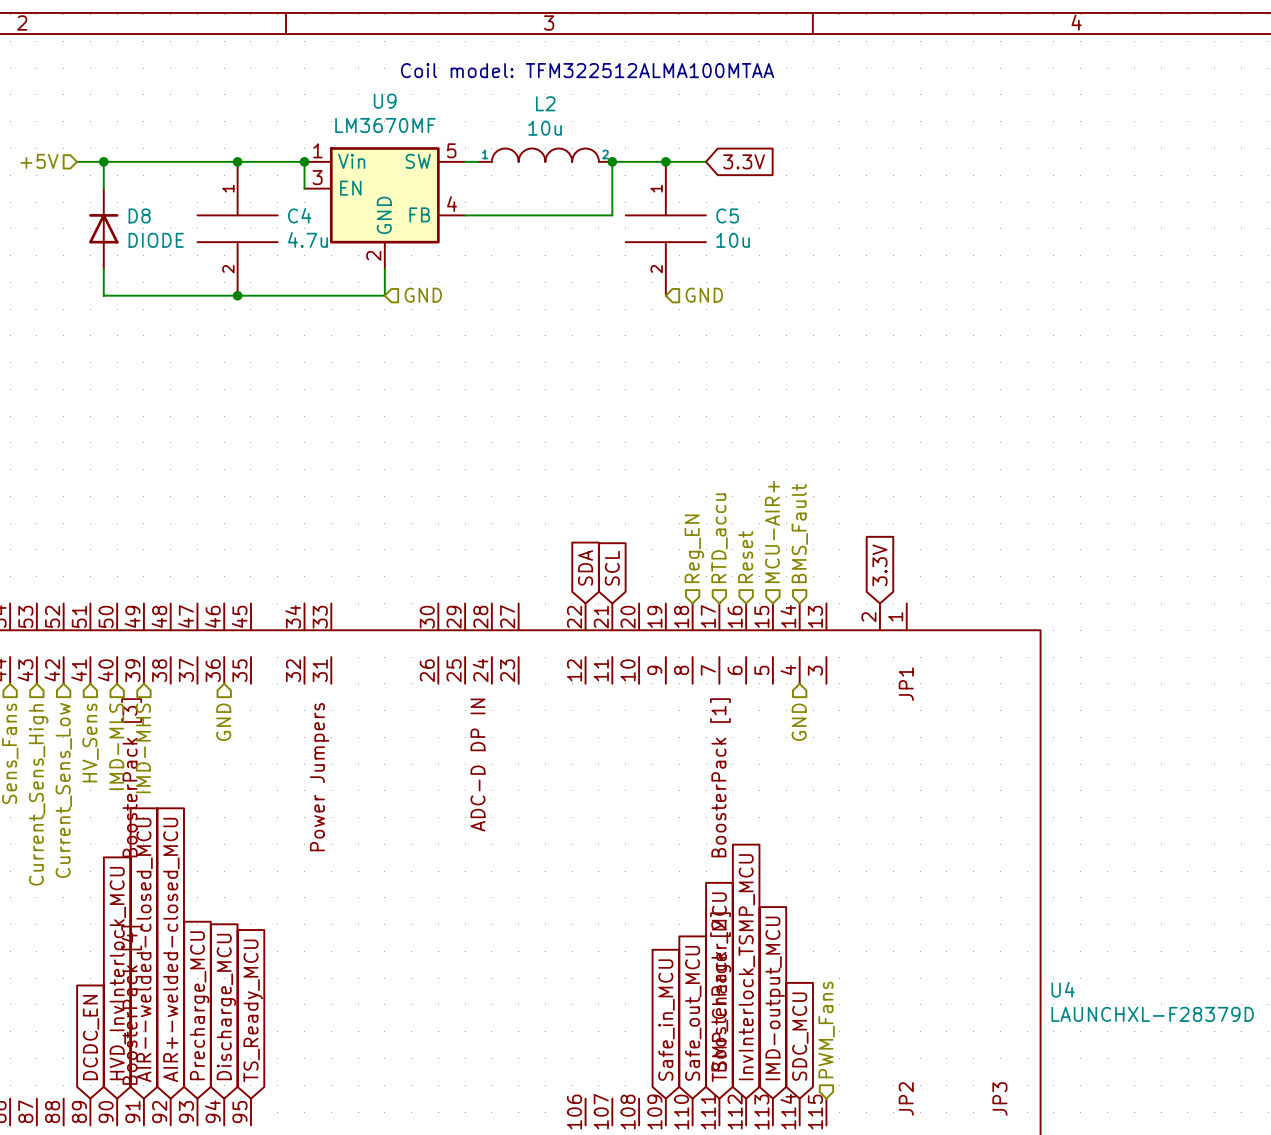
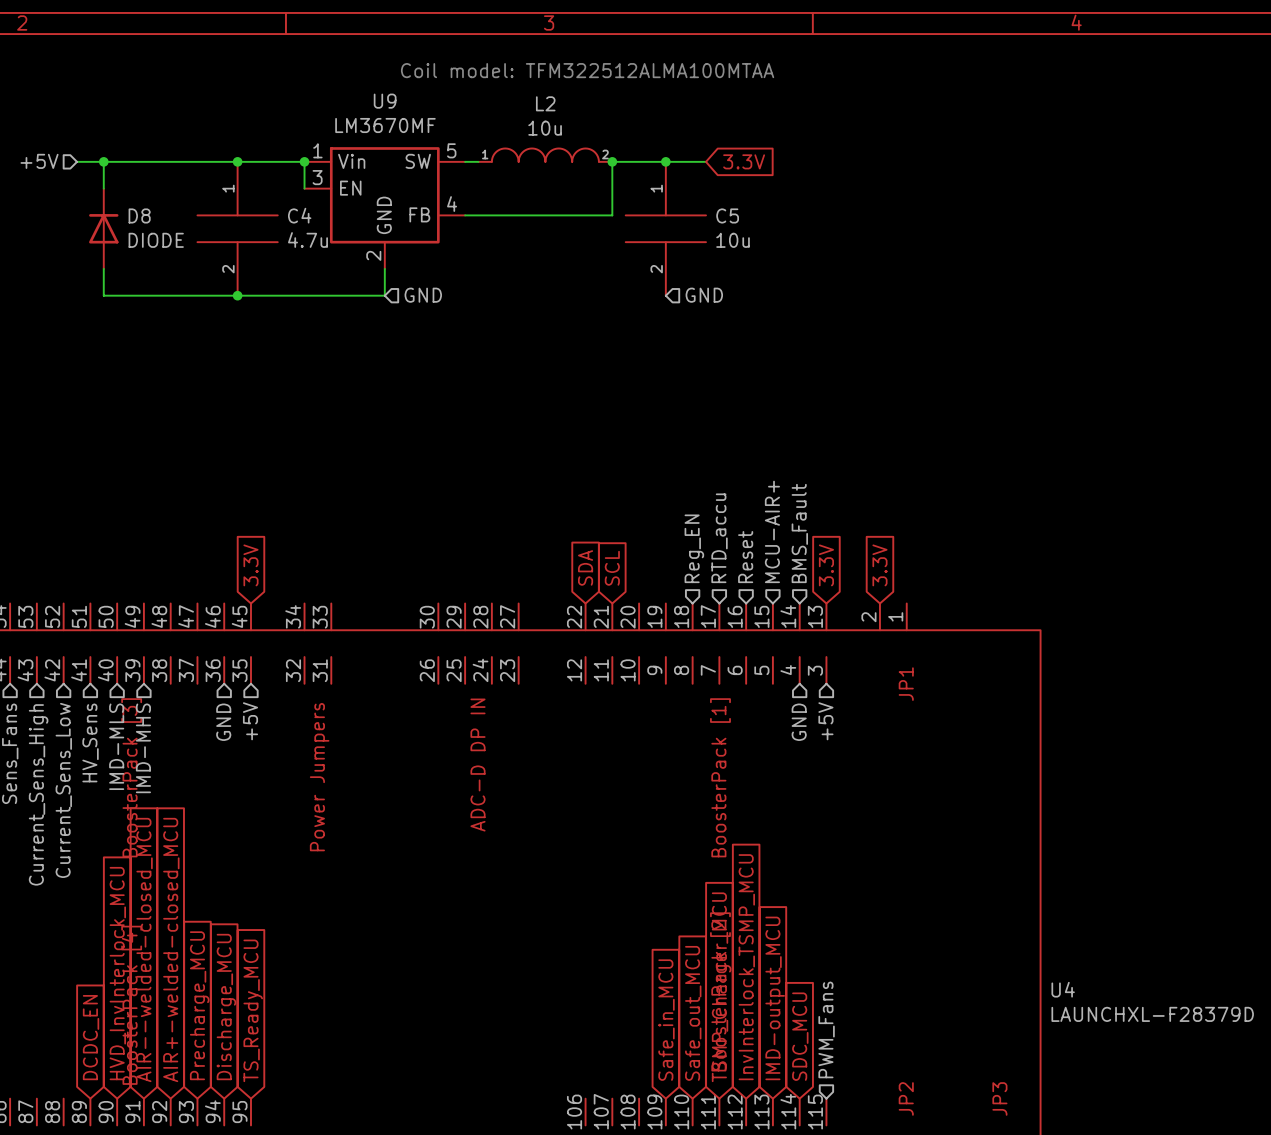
global label: none -> 3.3V (250, 565)
global label: none -> 3.3V (826, 565)
hierarchical label: none -> +5V (250, 721)
hierarchical label: none -> +5V (825, 721)

